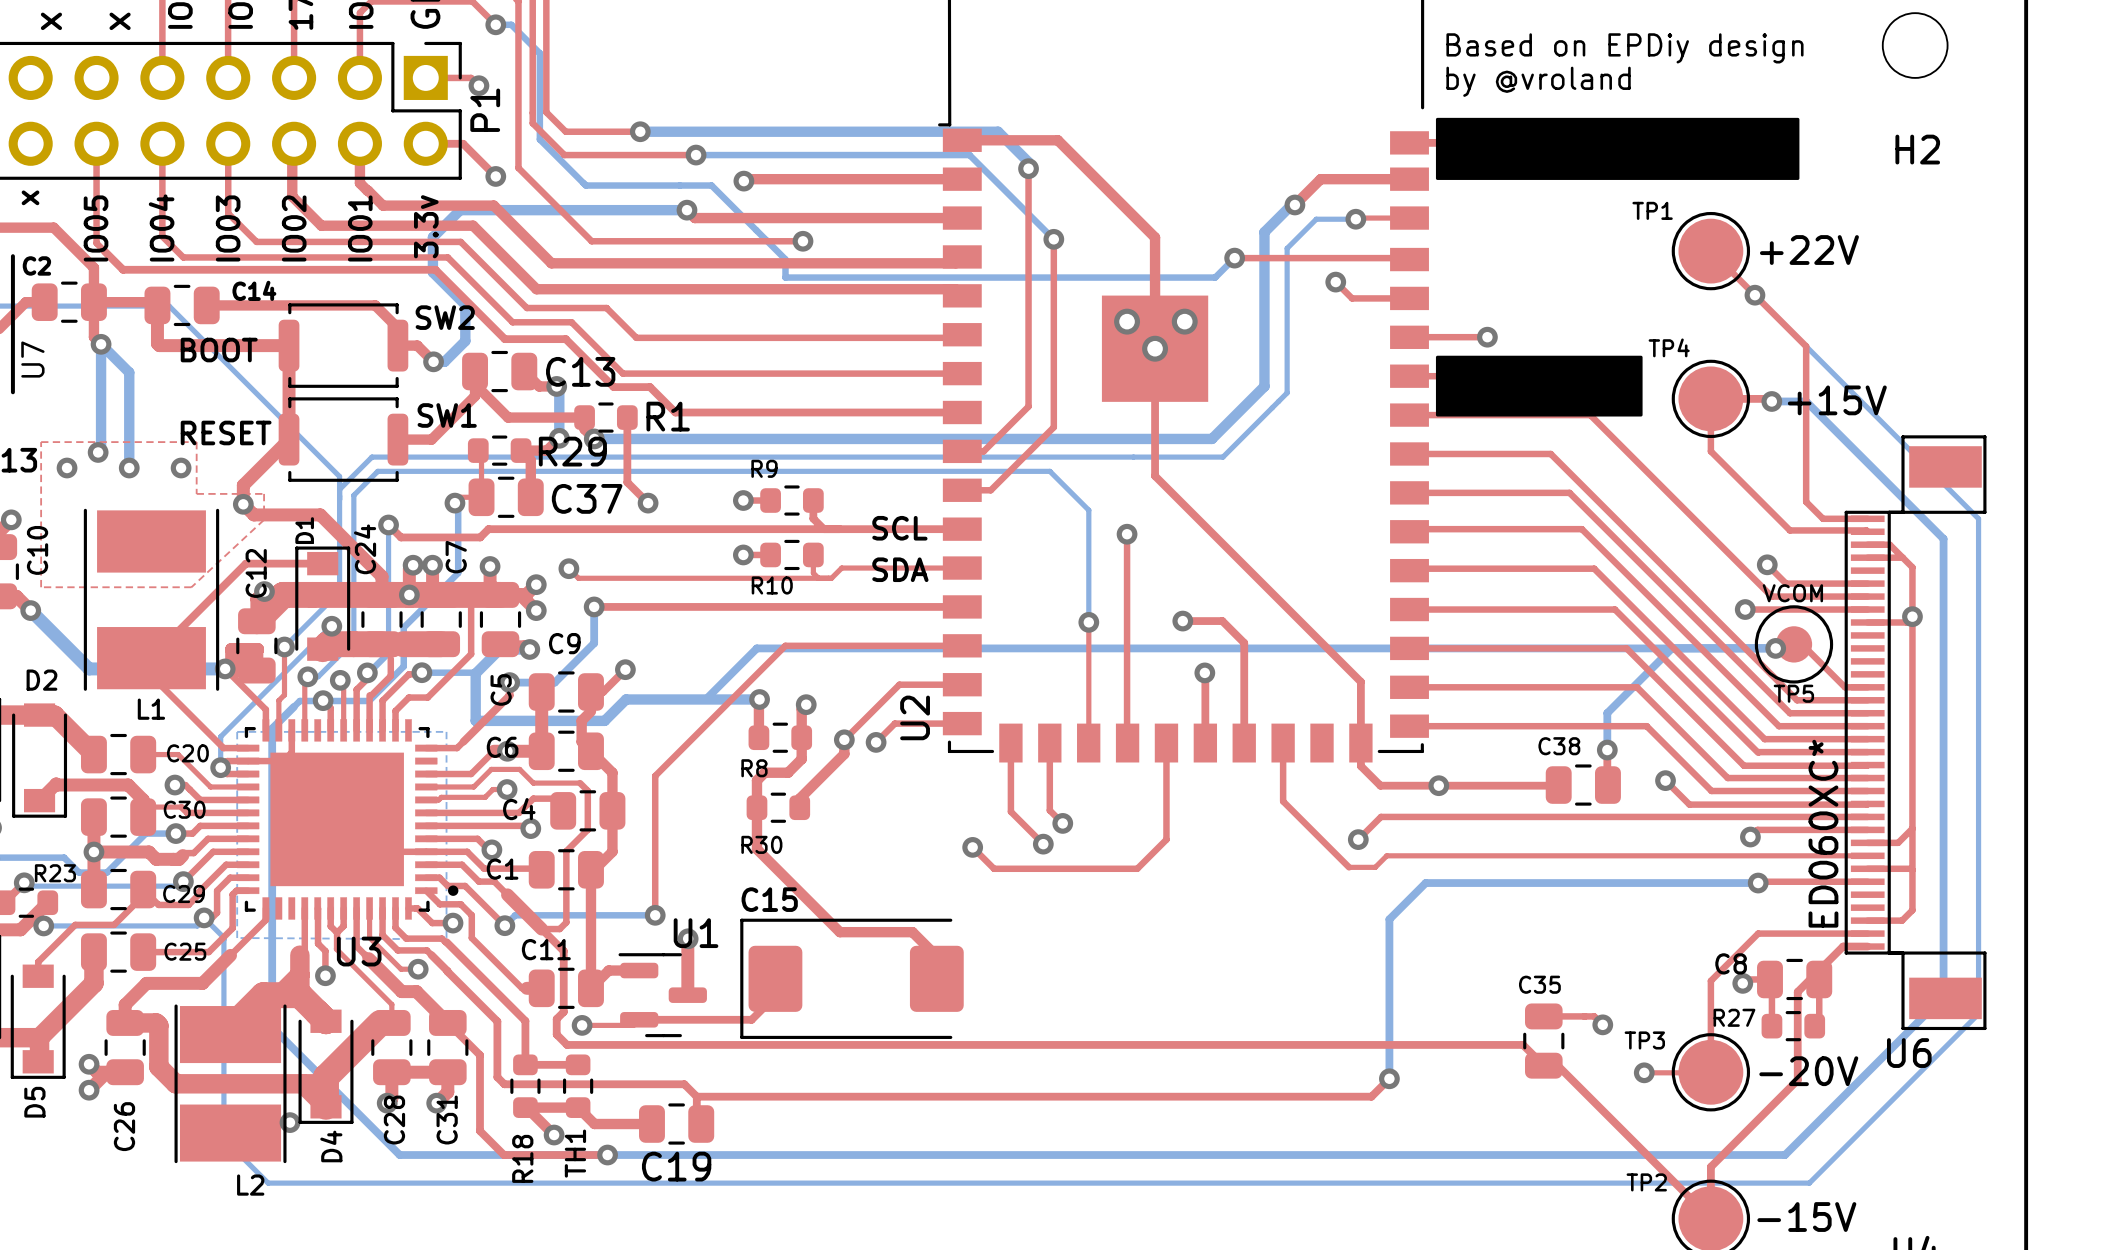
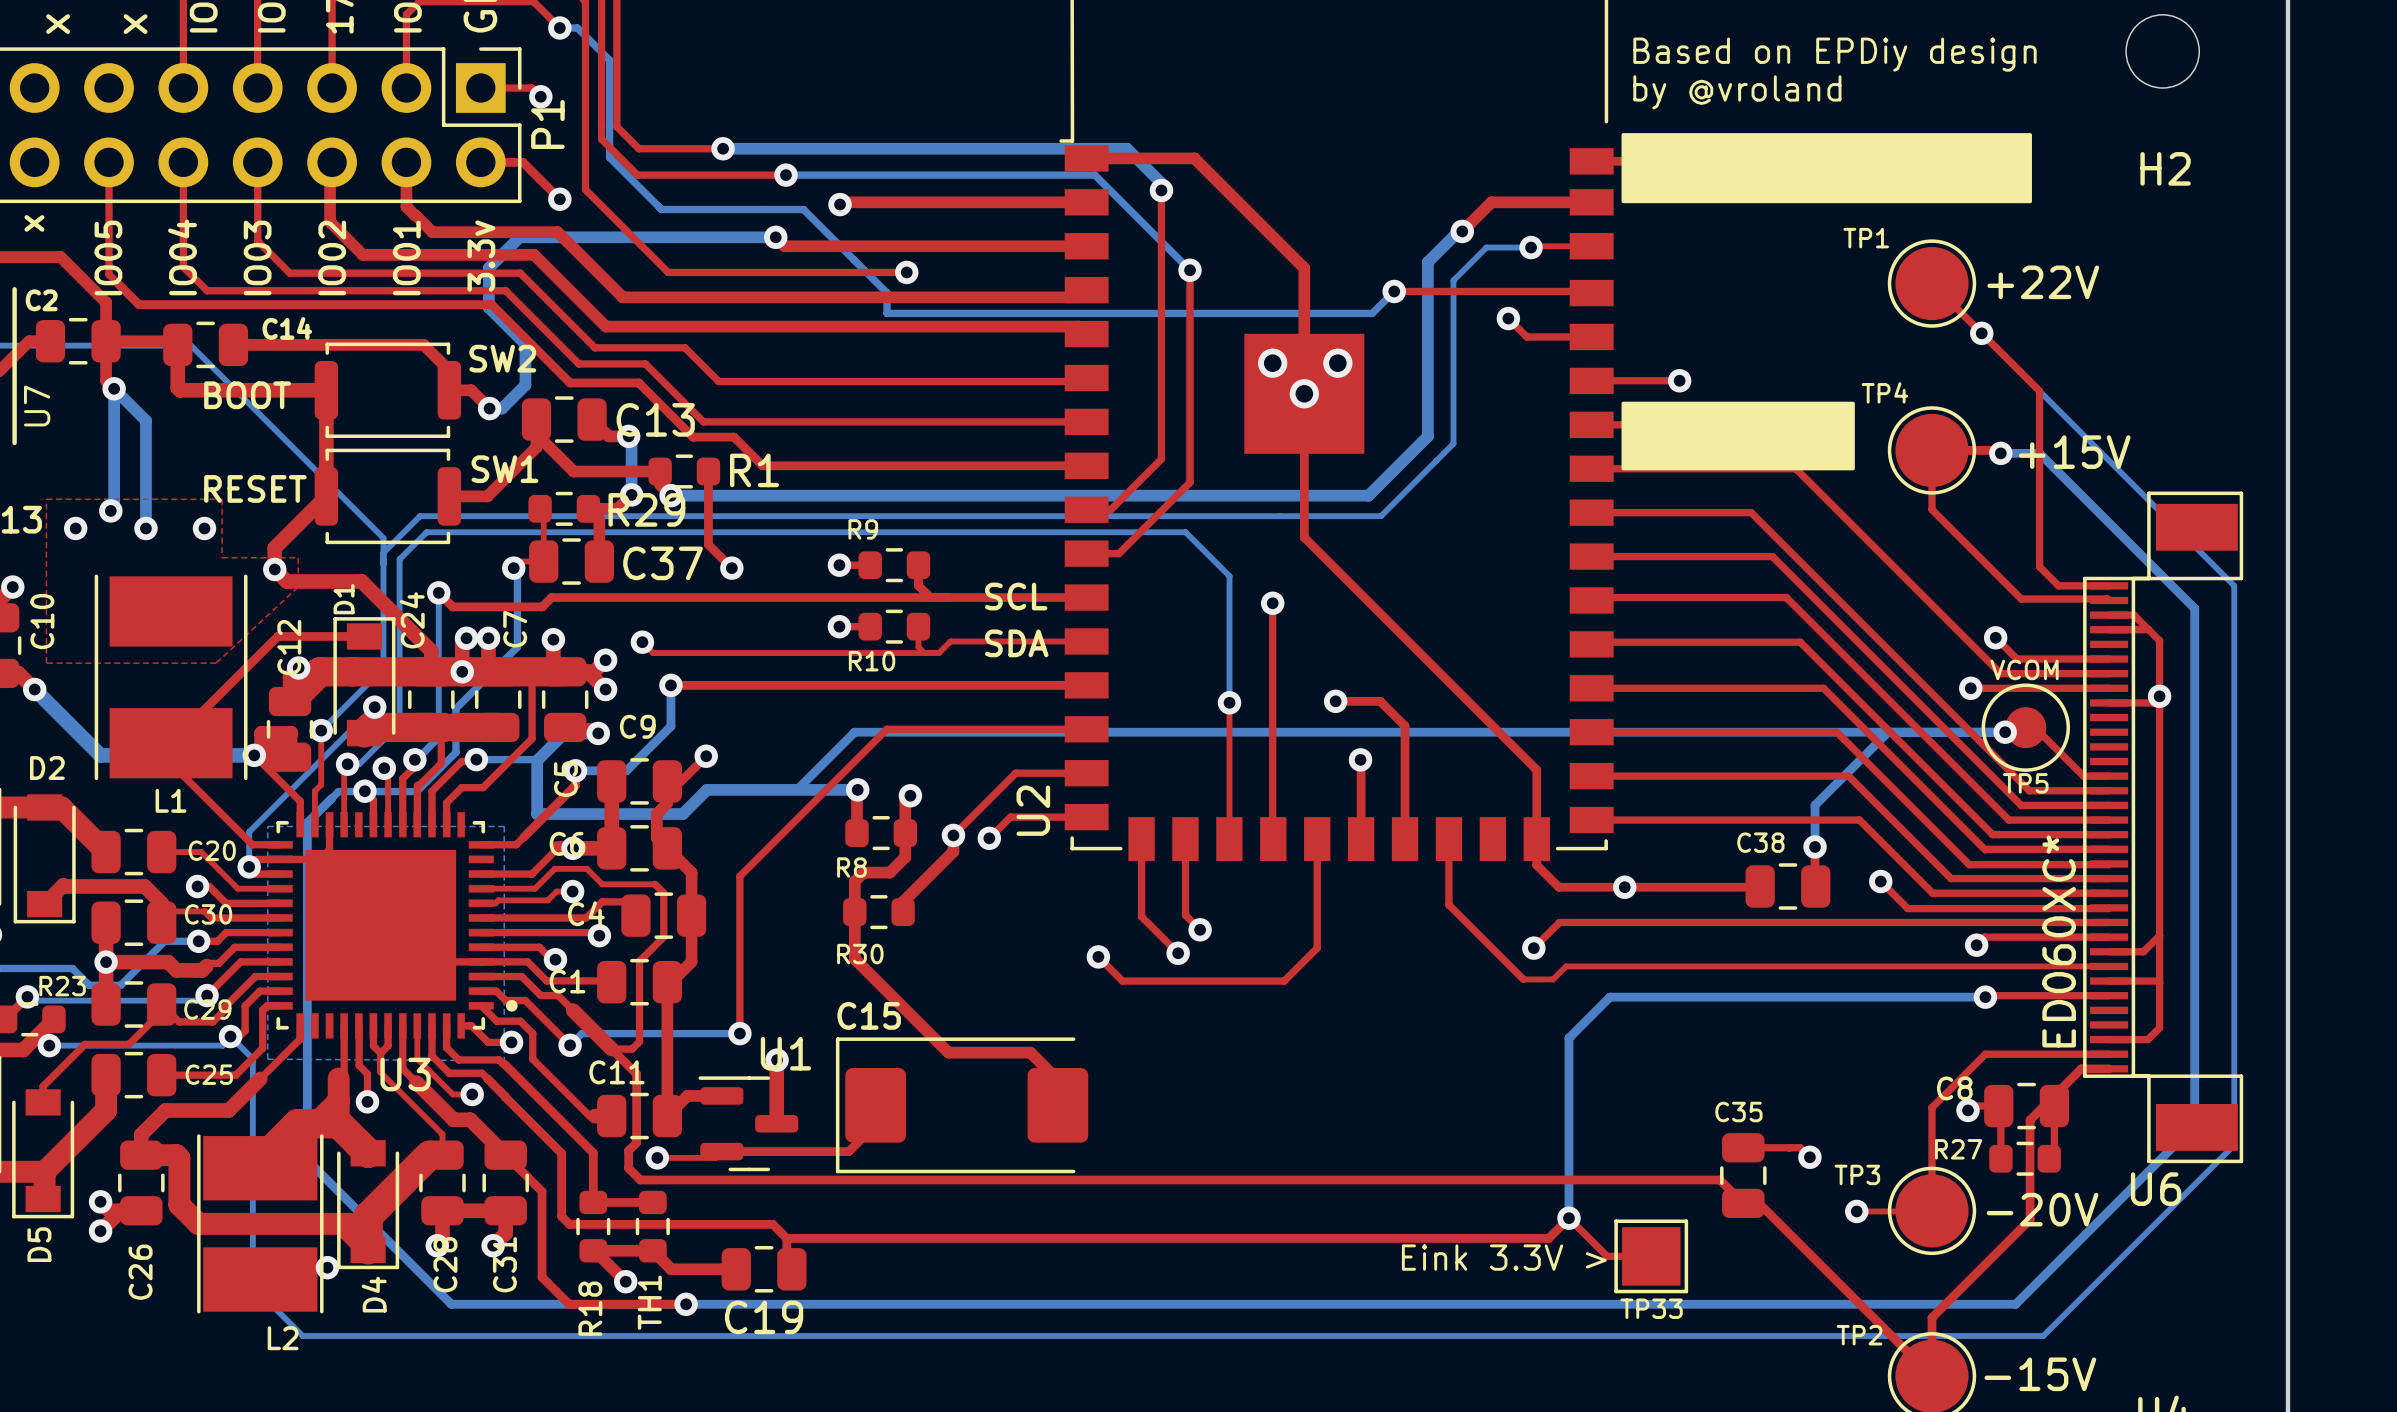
top track: none -> (1568, 1218) (1607, 1256) (1651, 1256)
TP33: none -> (1651, 1256)
text: none -> Eink 3.3V > (1504, 1257)

